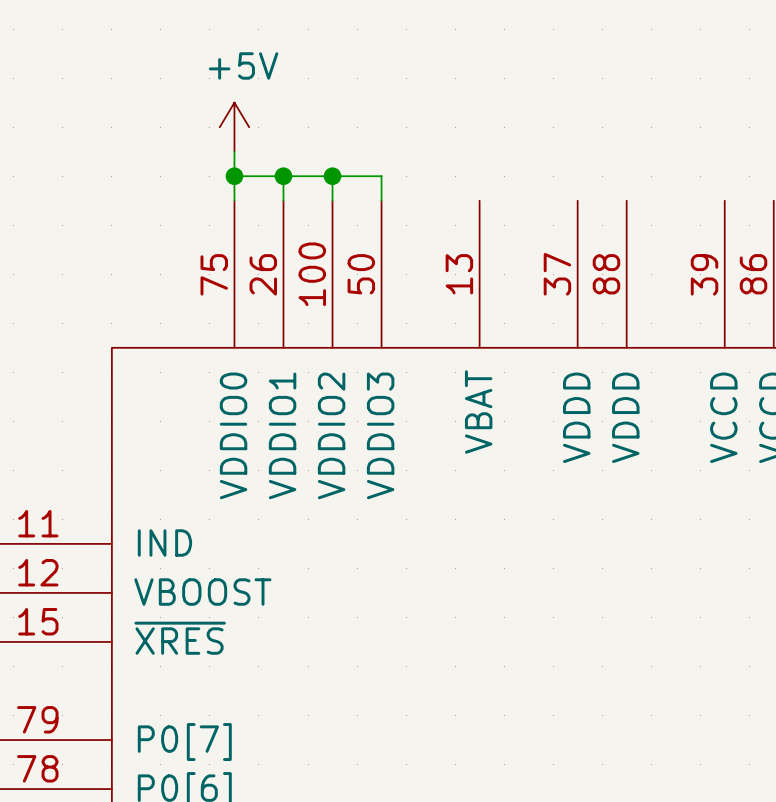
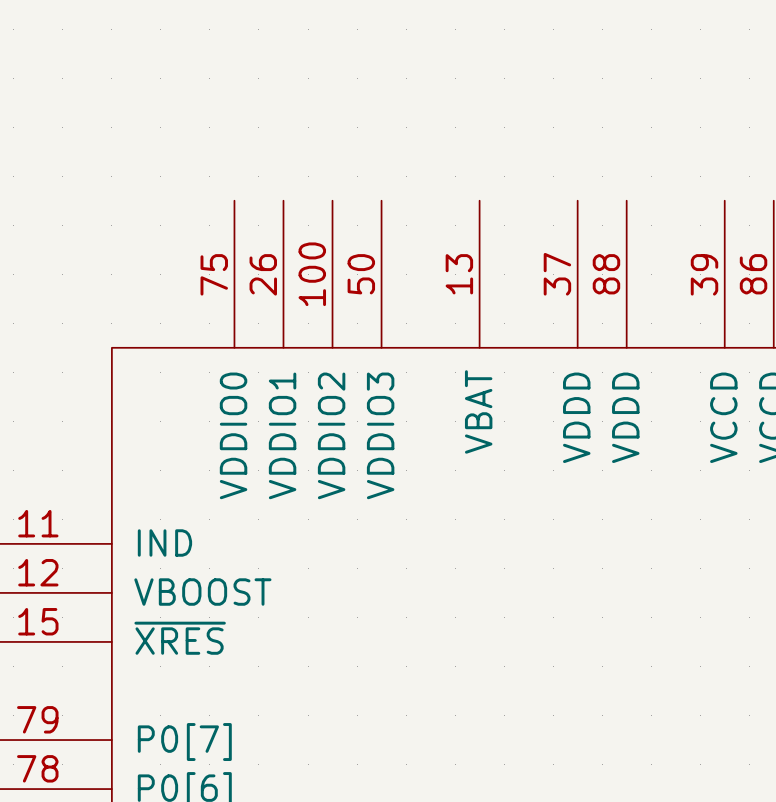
power symbol: +5V (234, 127) -> none
wire: (234, 151) (234, 200) -> none
wire: (234, 176) (381, 176) (381, 200) -> none
junction: (234, 176) -> none
wire: (283, 176) (283, 200) -> none
junction: (283, 176) -> none
wire: (332, 176) (332, 200) -> none
junction: (332, 176) -> none

